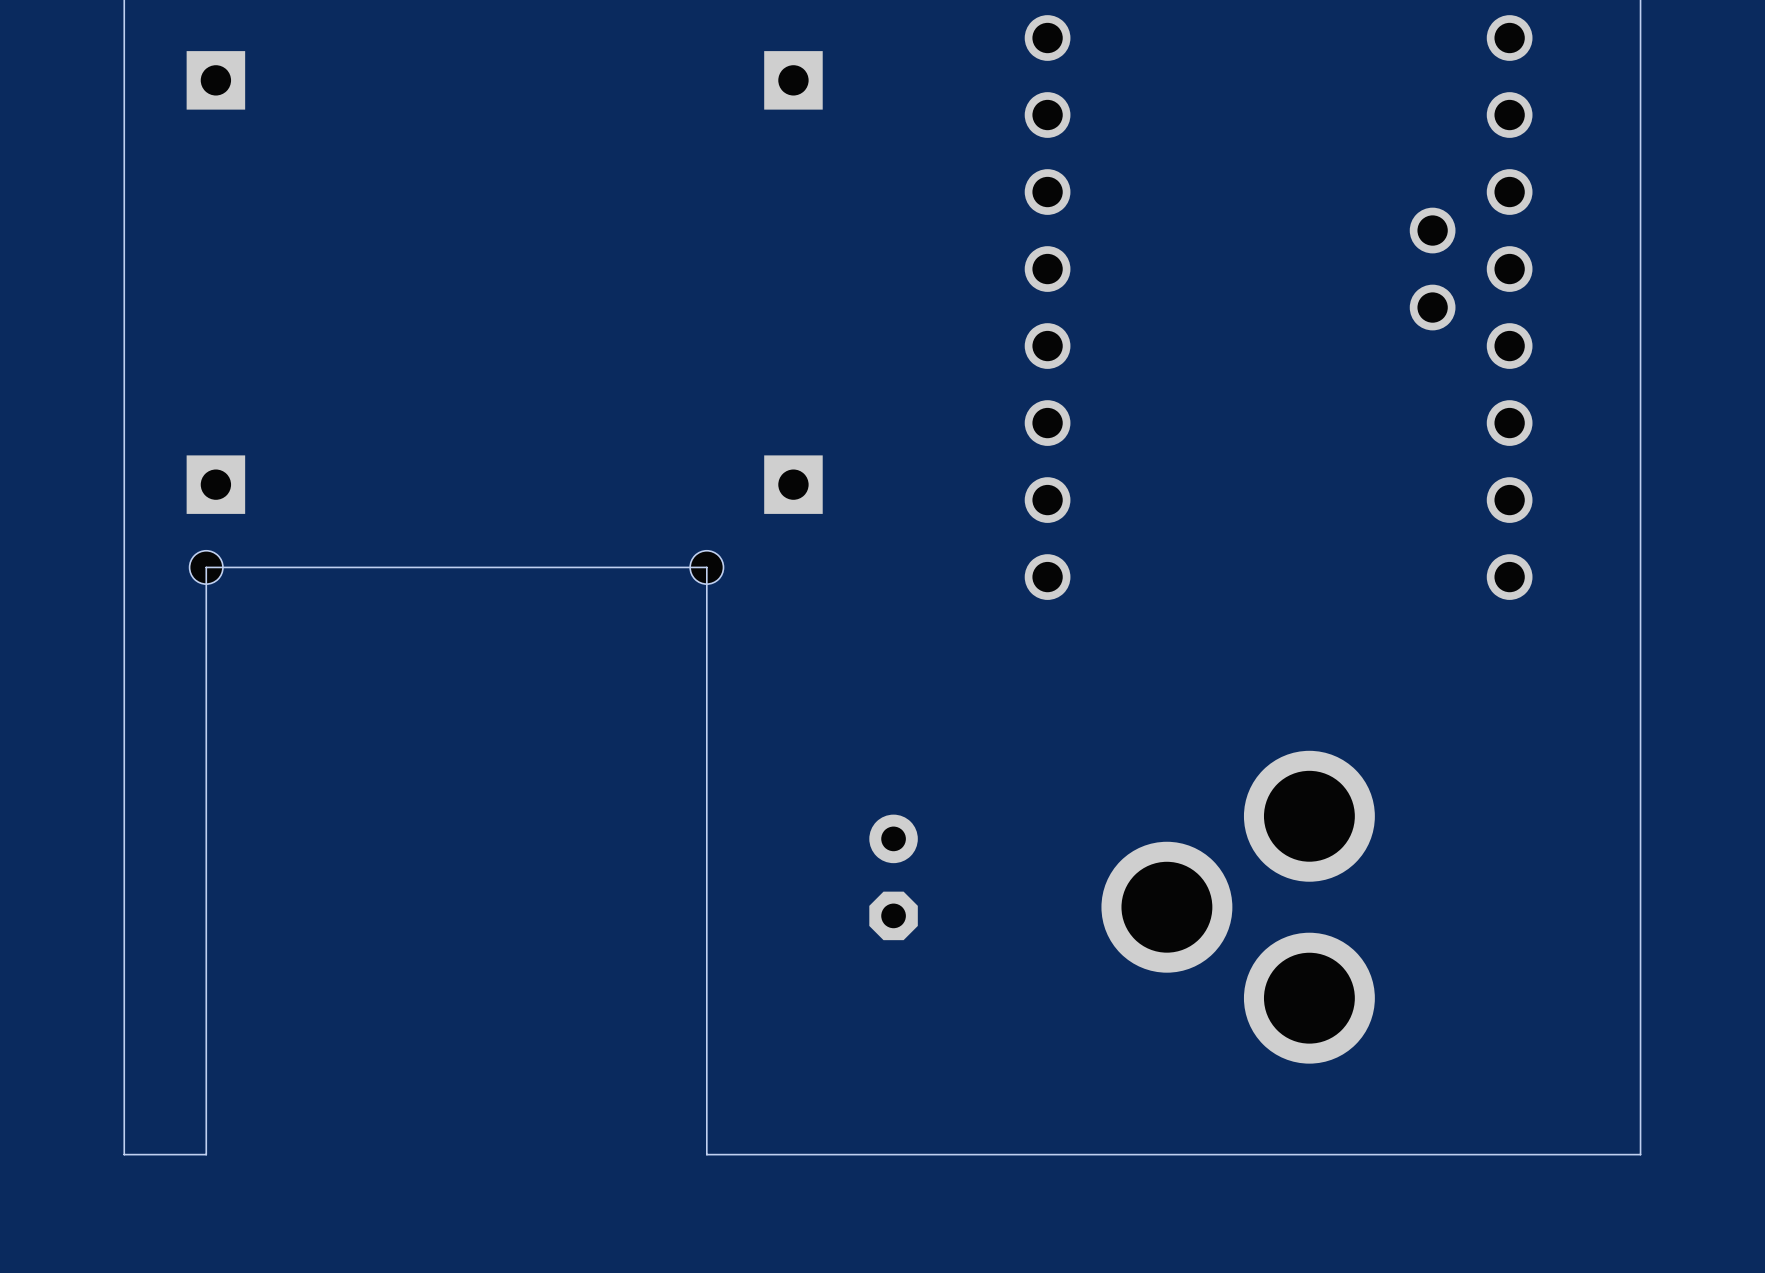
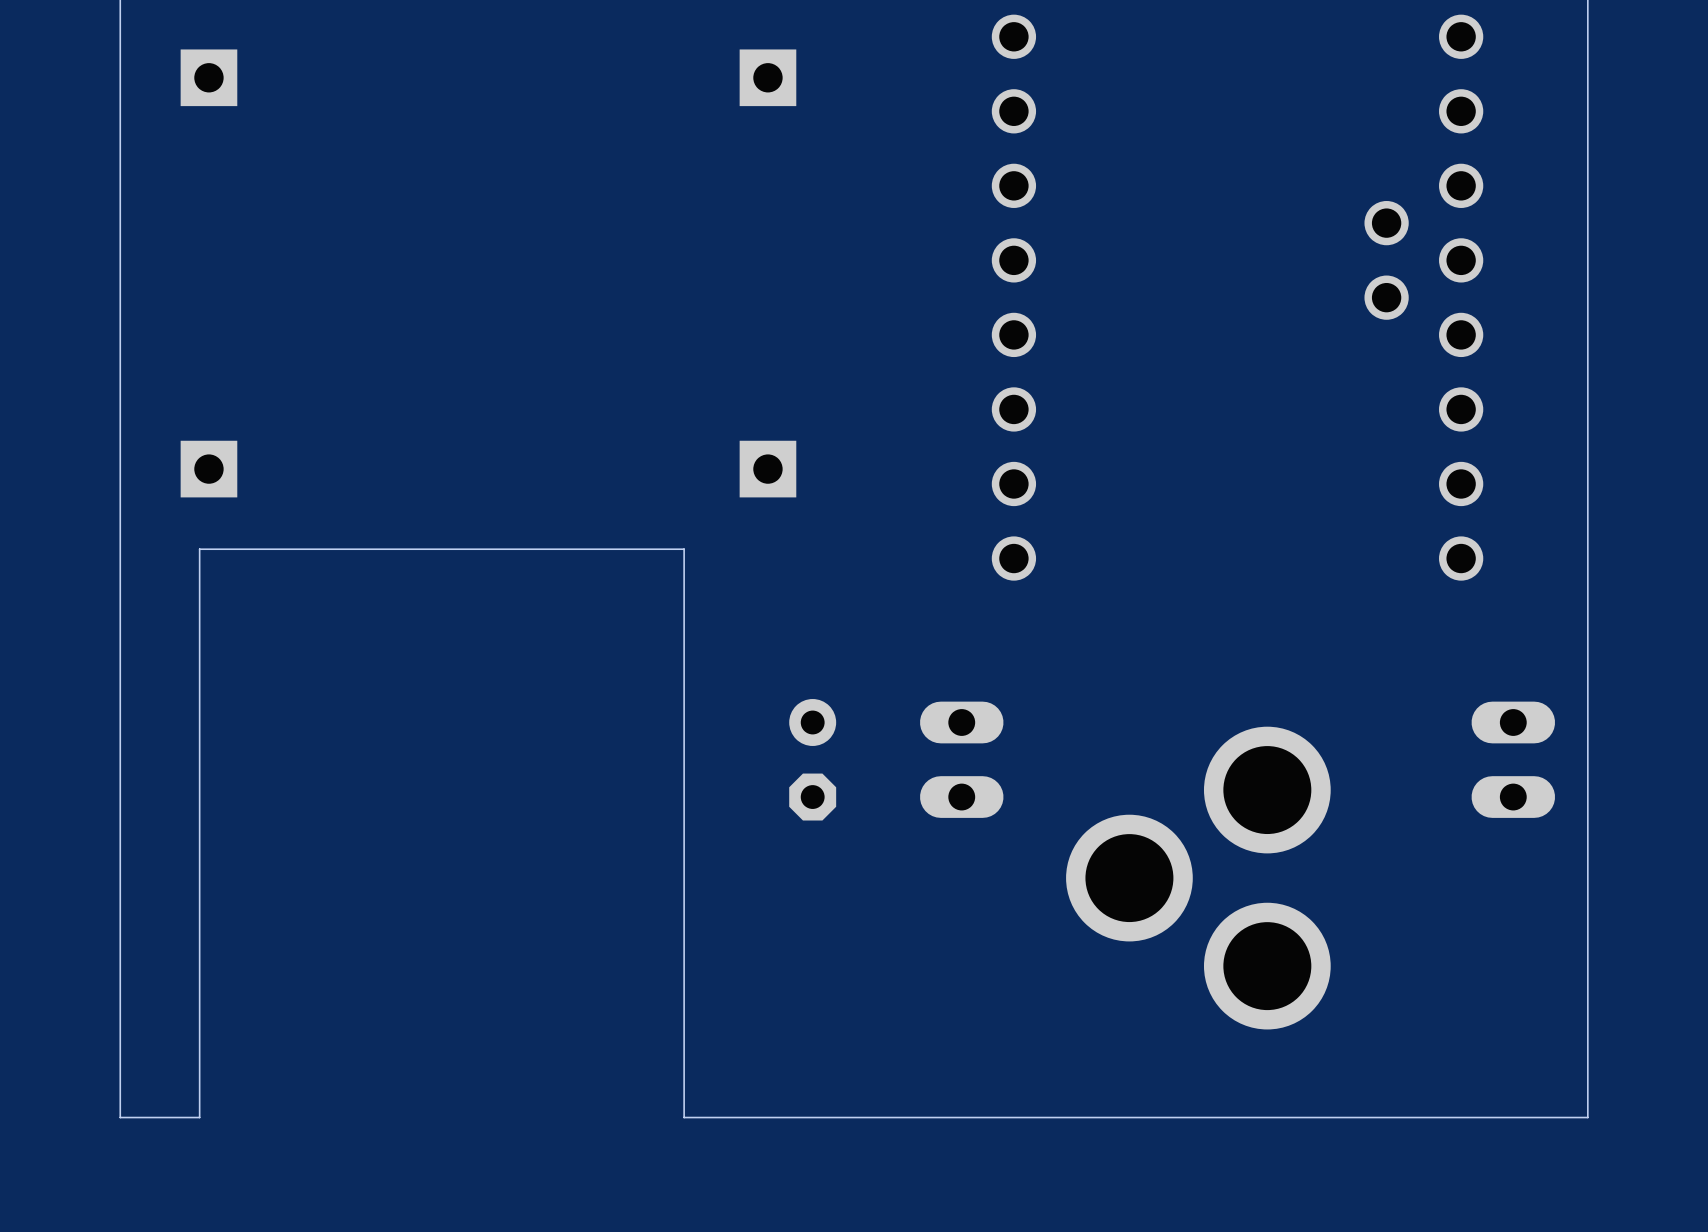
hole: (206, 567) -> none
hole: (706, 567) -> none
part: none -> (961, 759)
part: none -> (1513, 759)
part position: (893, 877) -> (812, 759)

